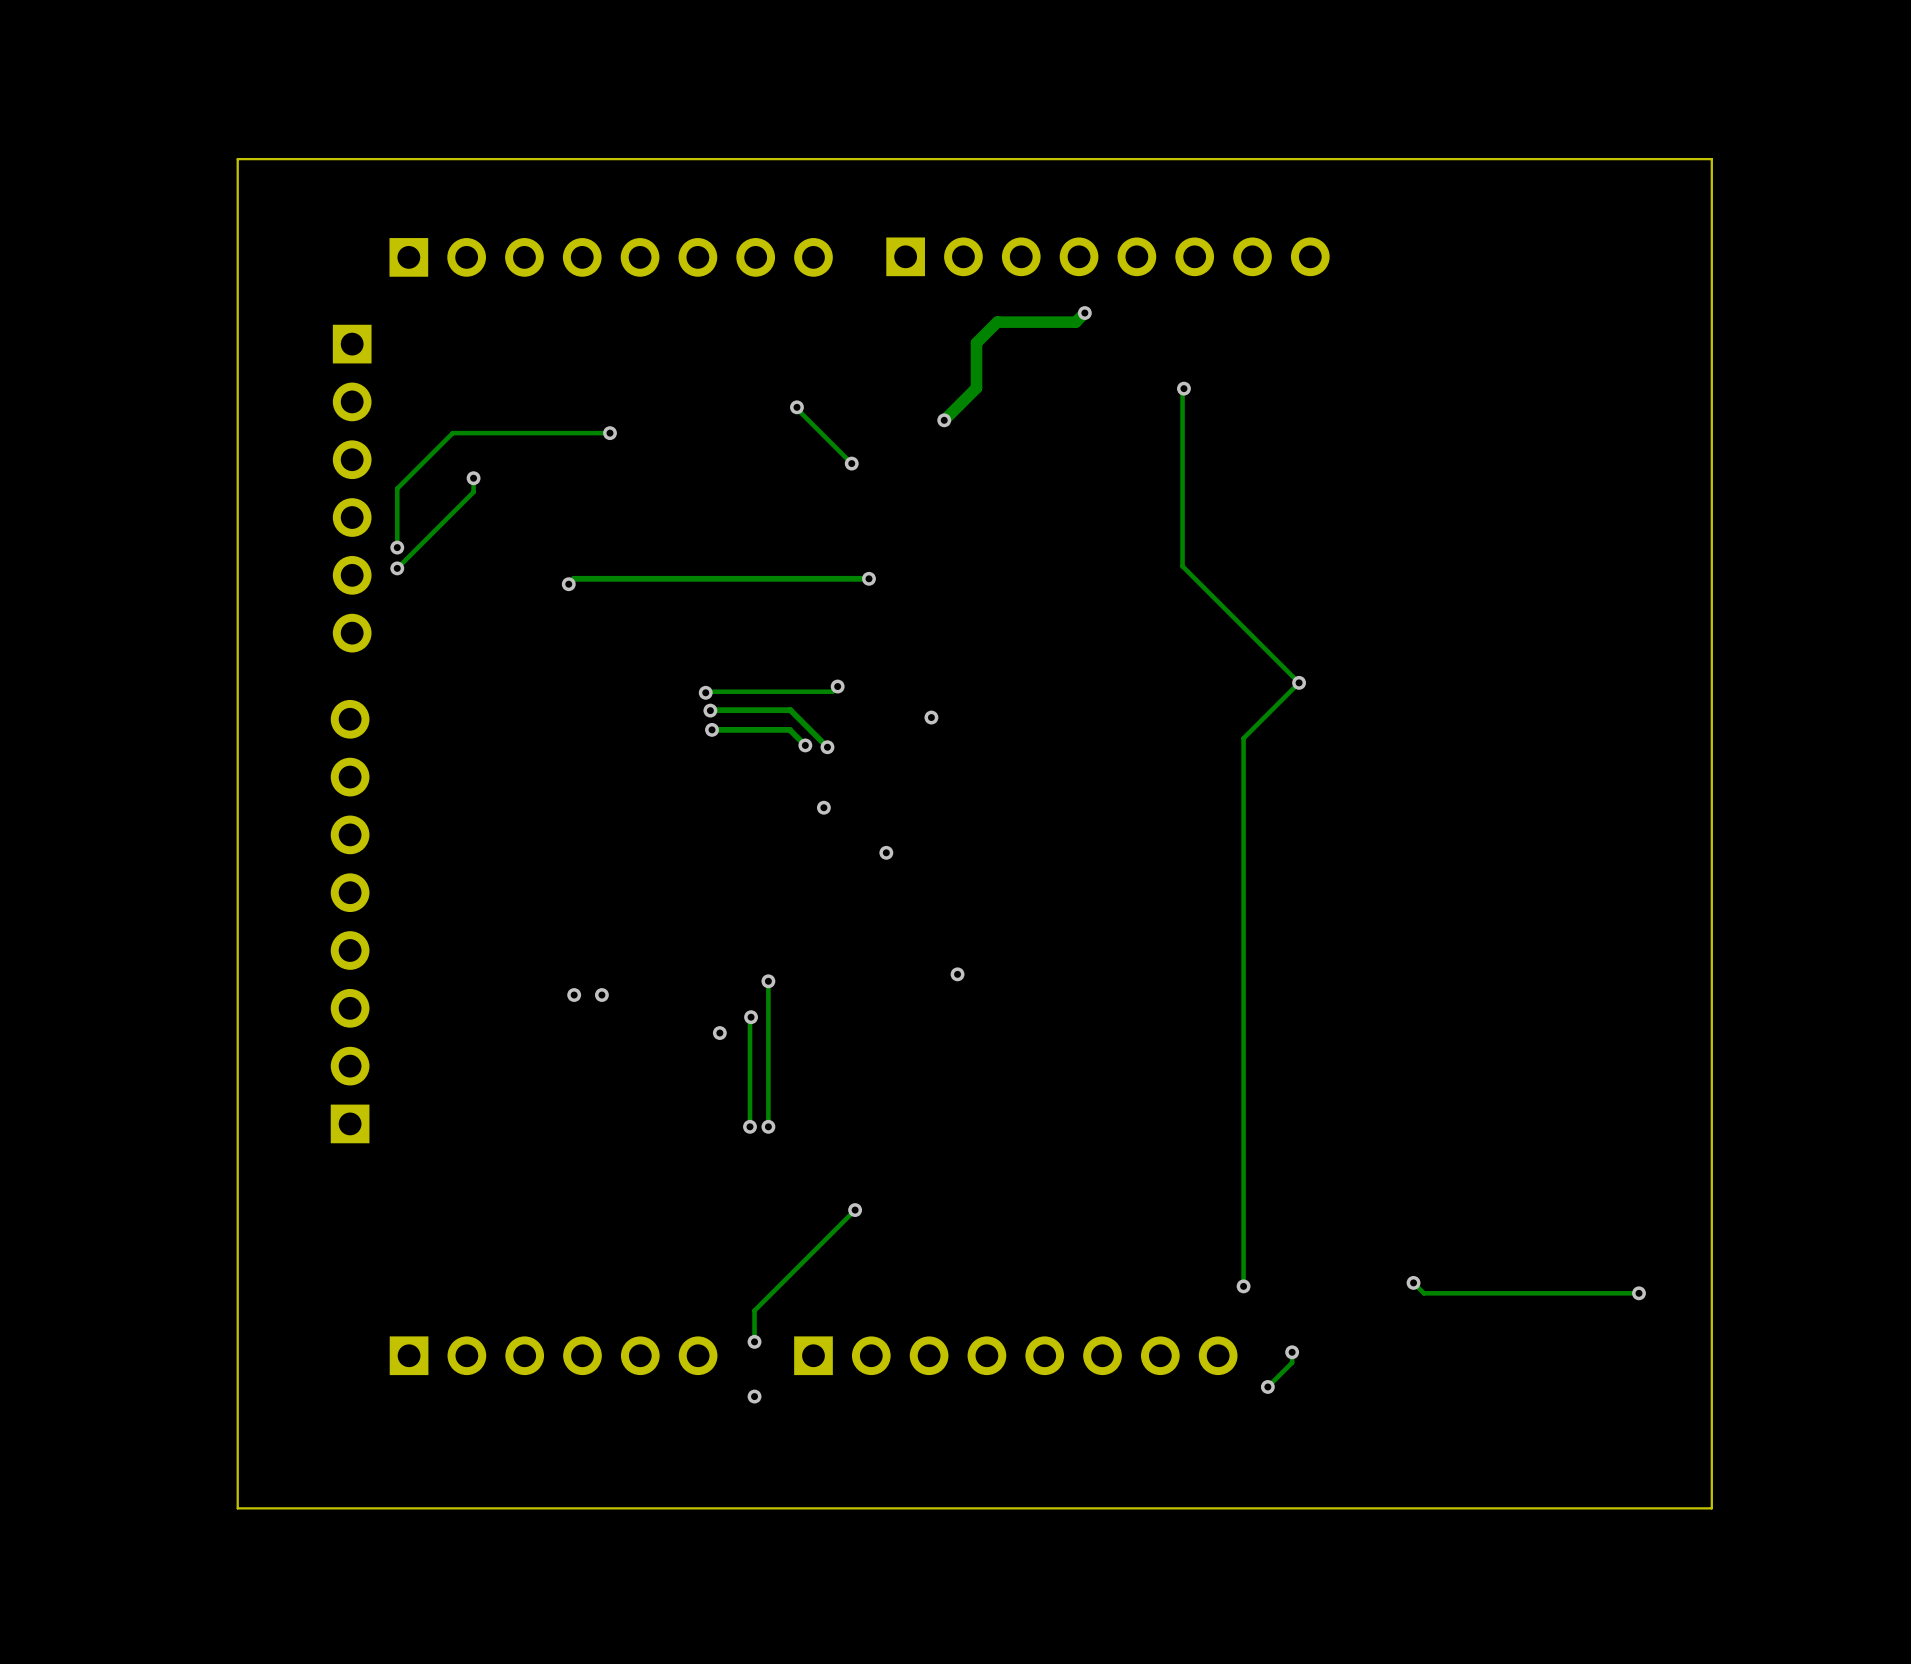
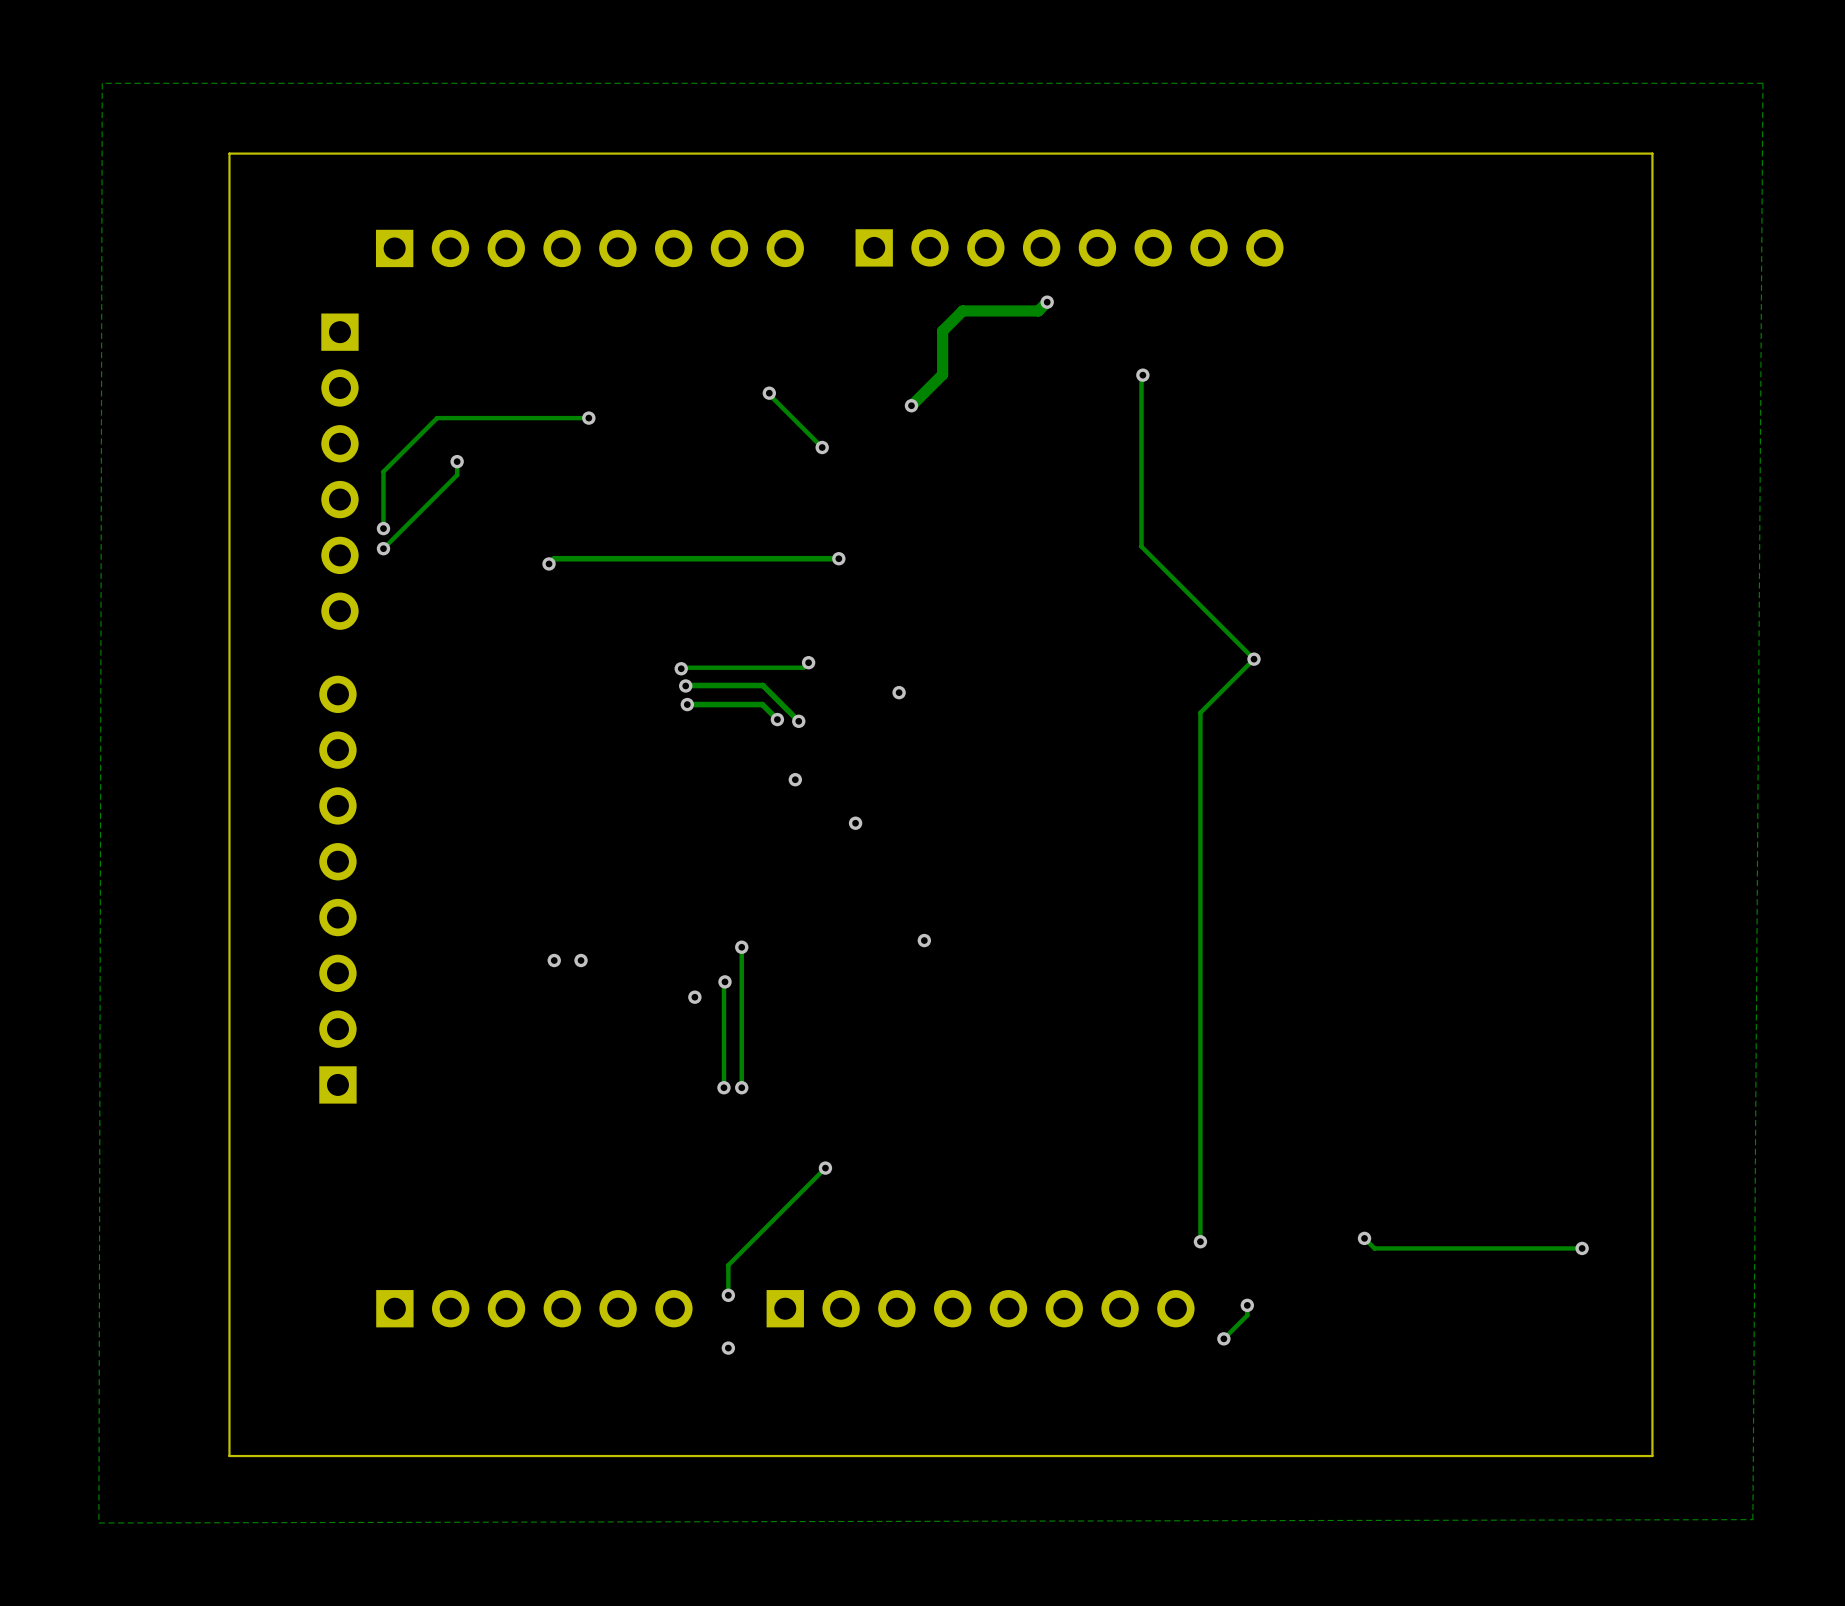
zone outline: none -> (1762, 83) (1752, 1519) (98, 1522) (102, 83) (1762, 83)

